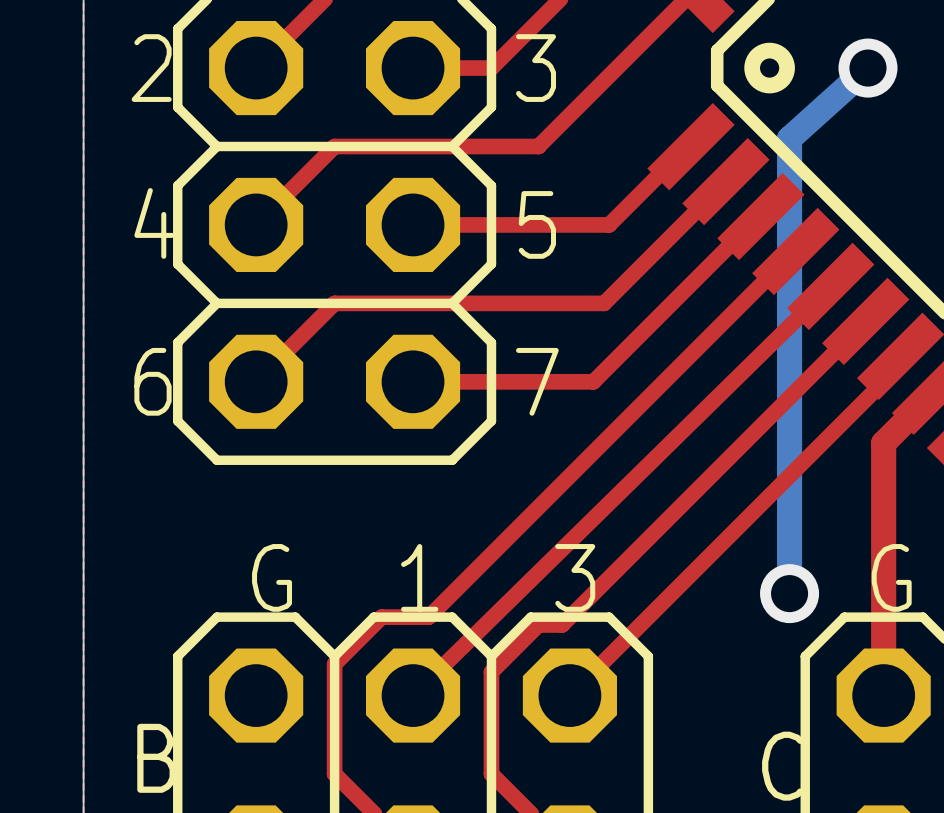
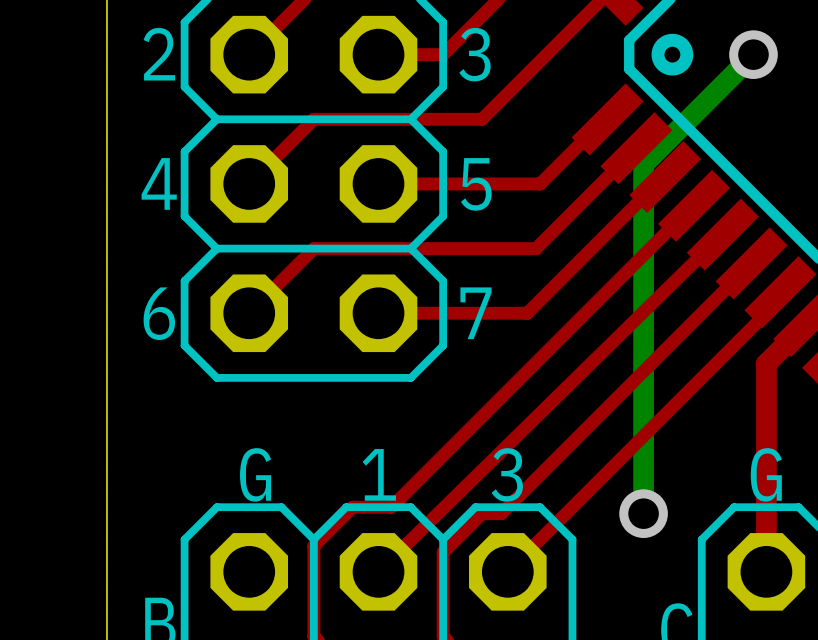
bottom track: (867, 68) (789, 138) (789, 593) -> (753, 54) (643, 164) (643, 513)
via position: (789, 593) -> (643, 513)

